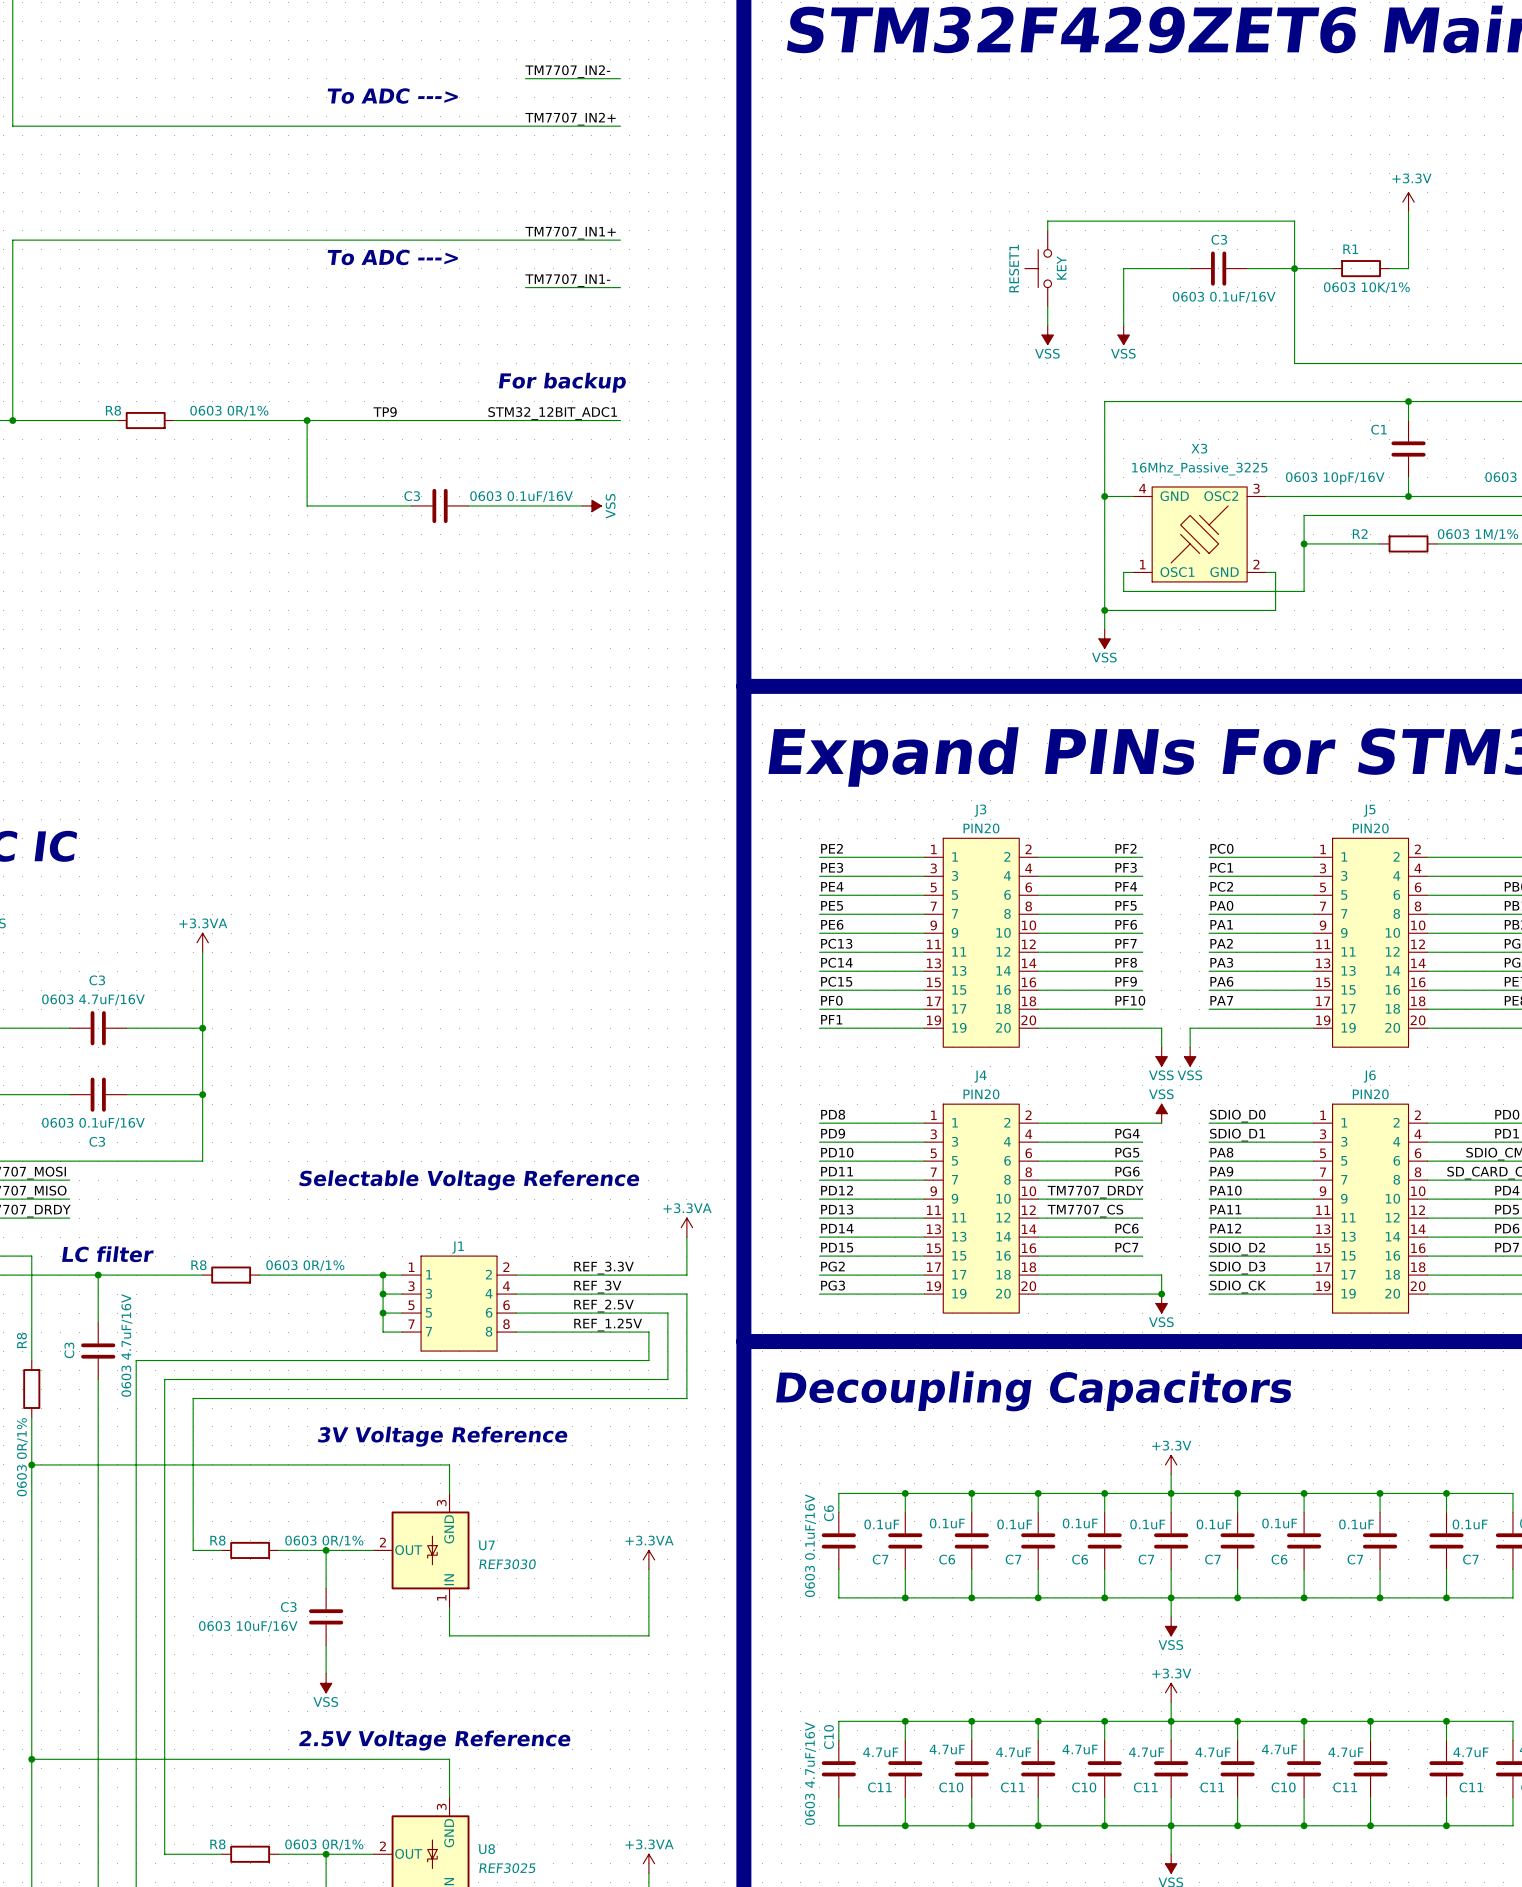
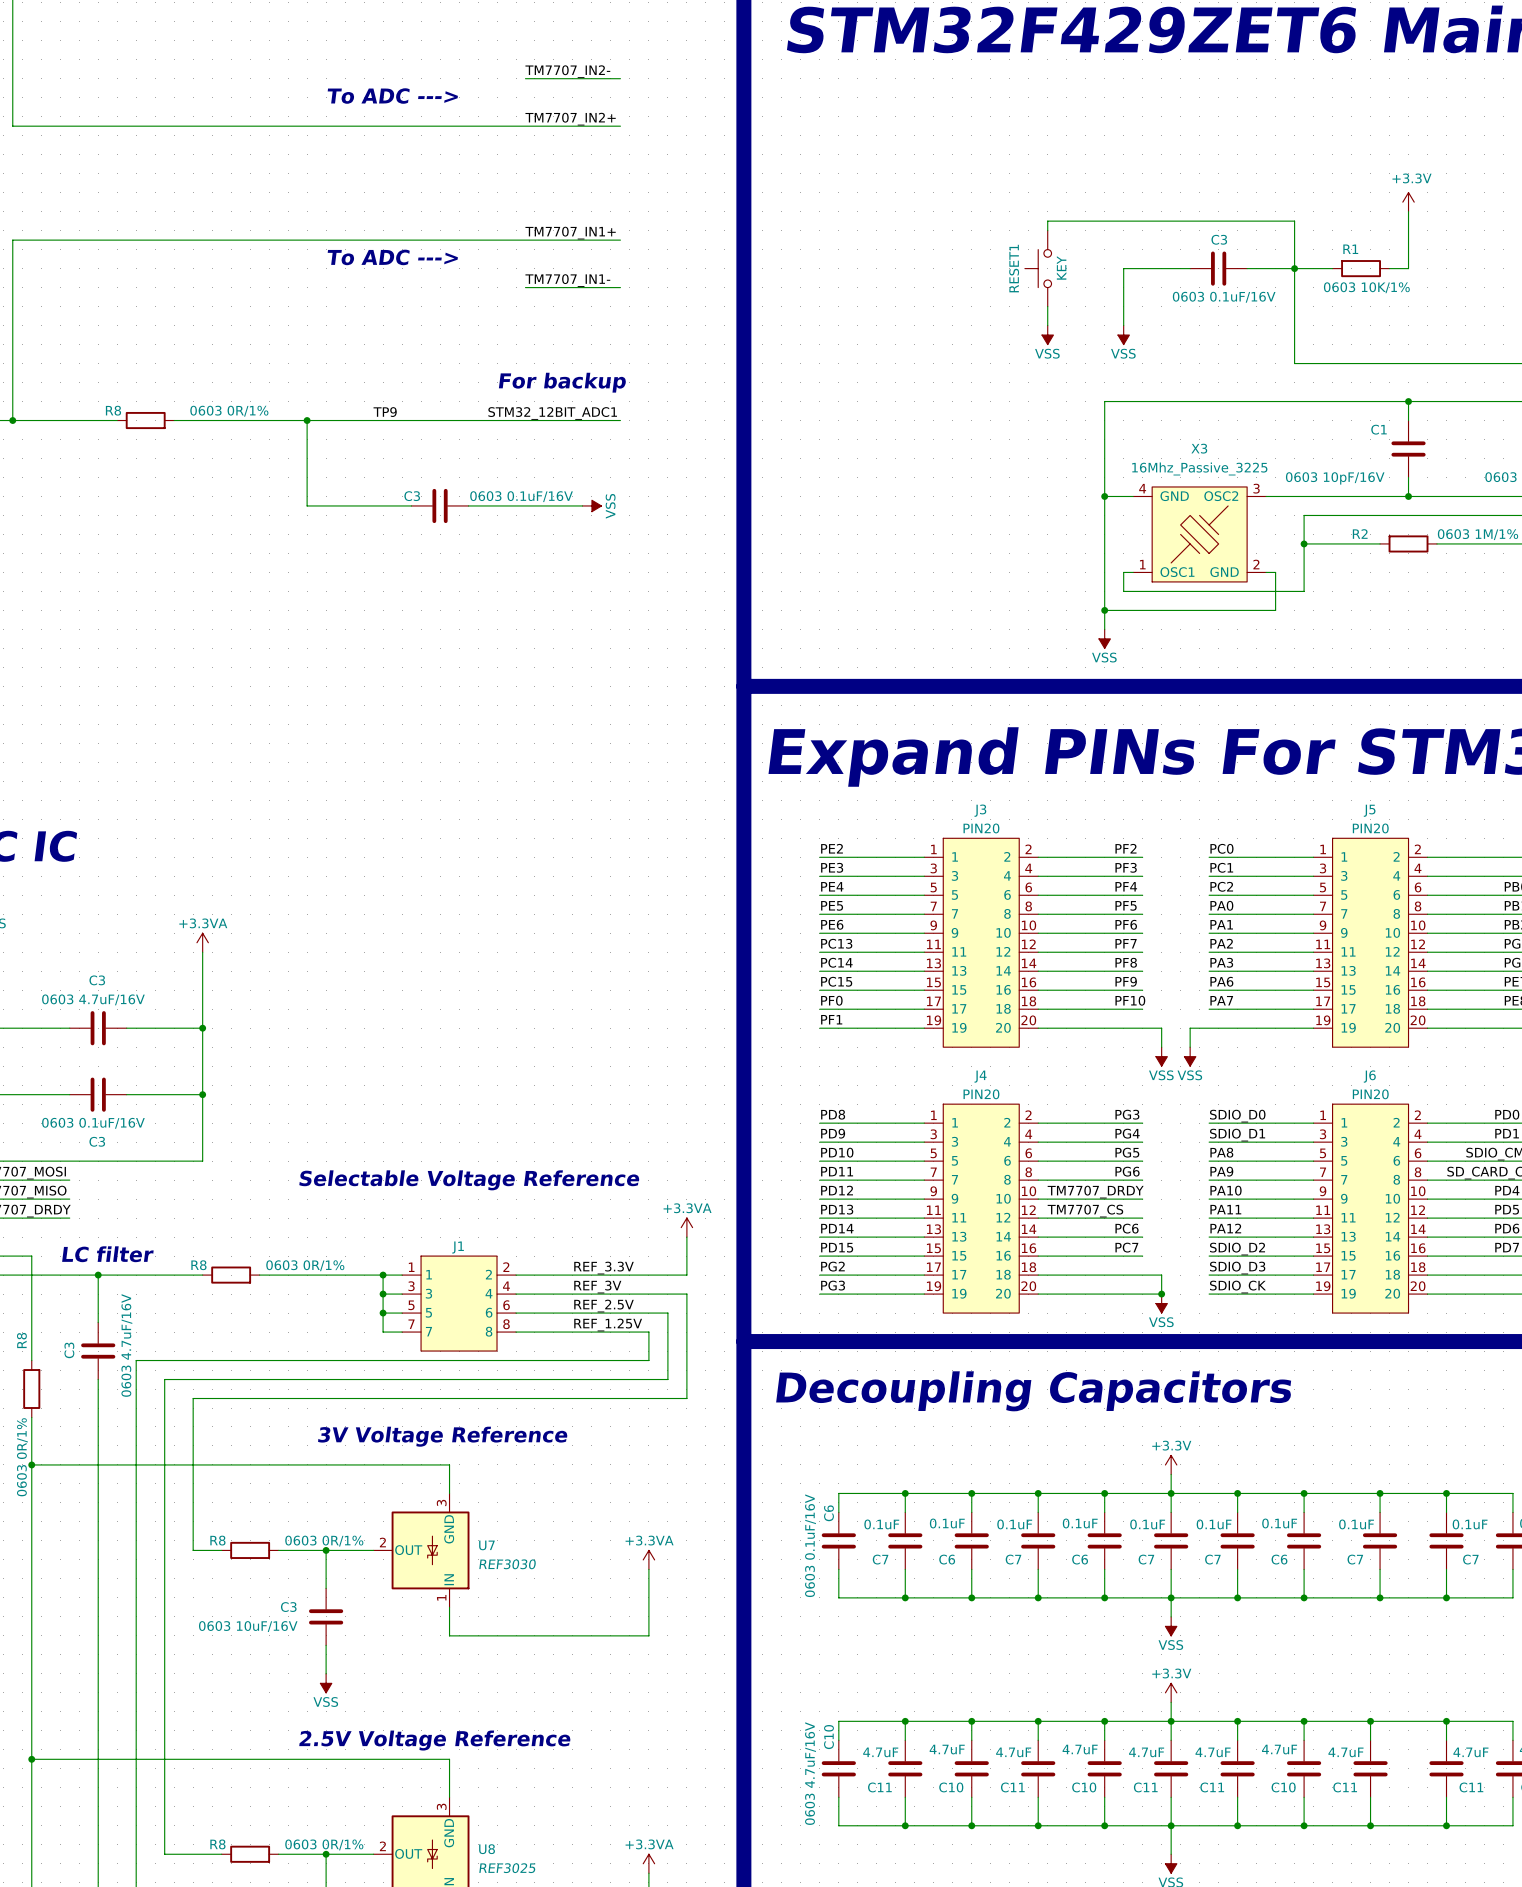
power symbol: VSS (1161, 1113) -> none
label: none -> PG3 (1127, 1114)
wire: (1142, 1123) (1161, 1123) -> none

